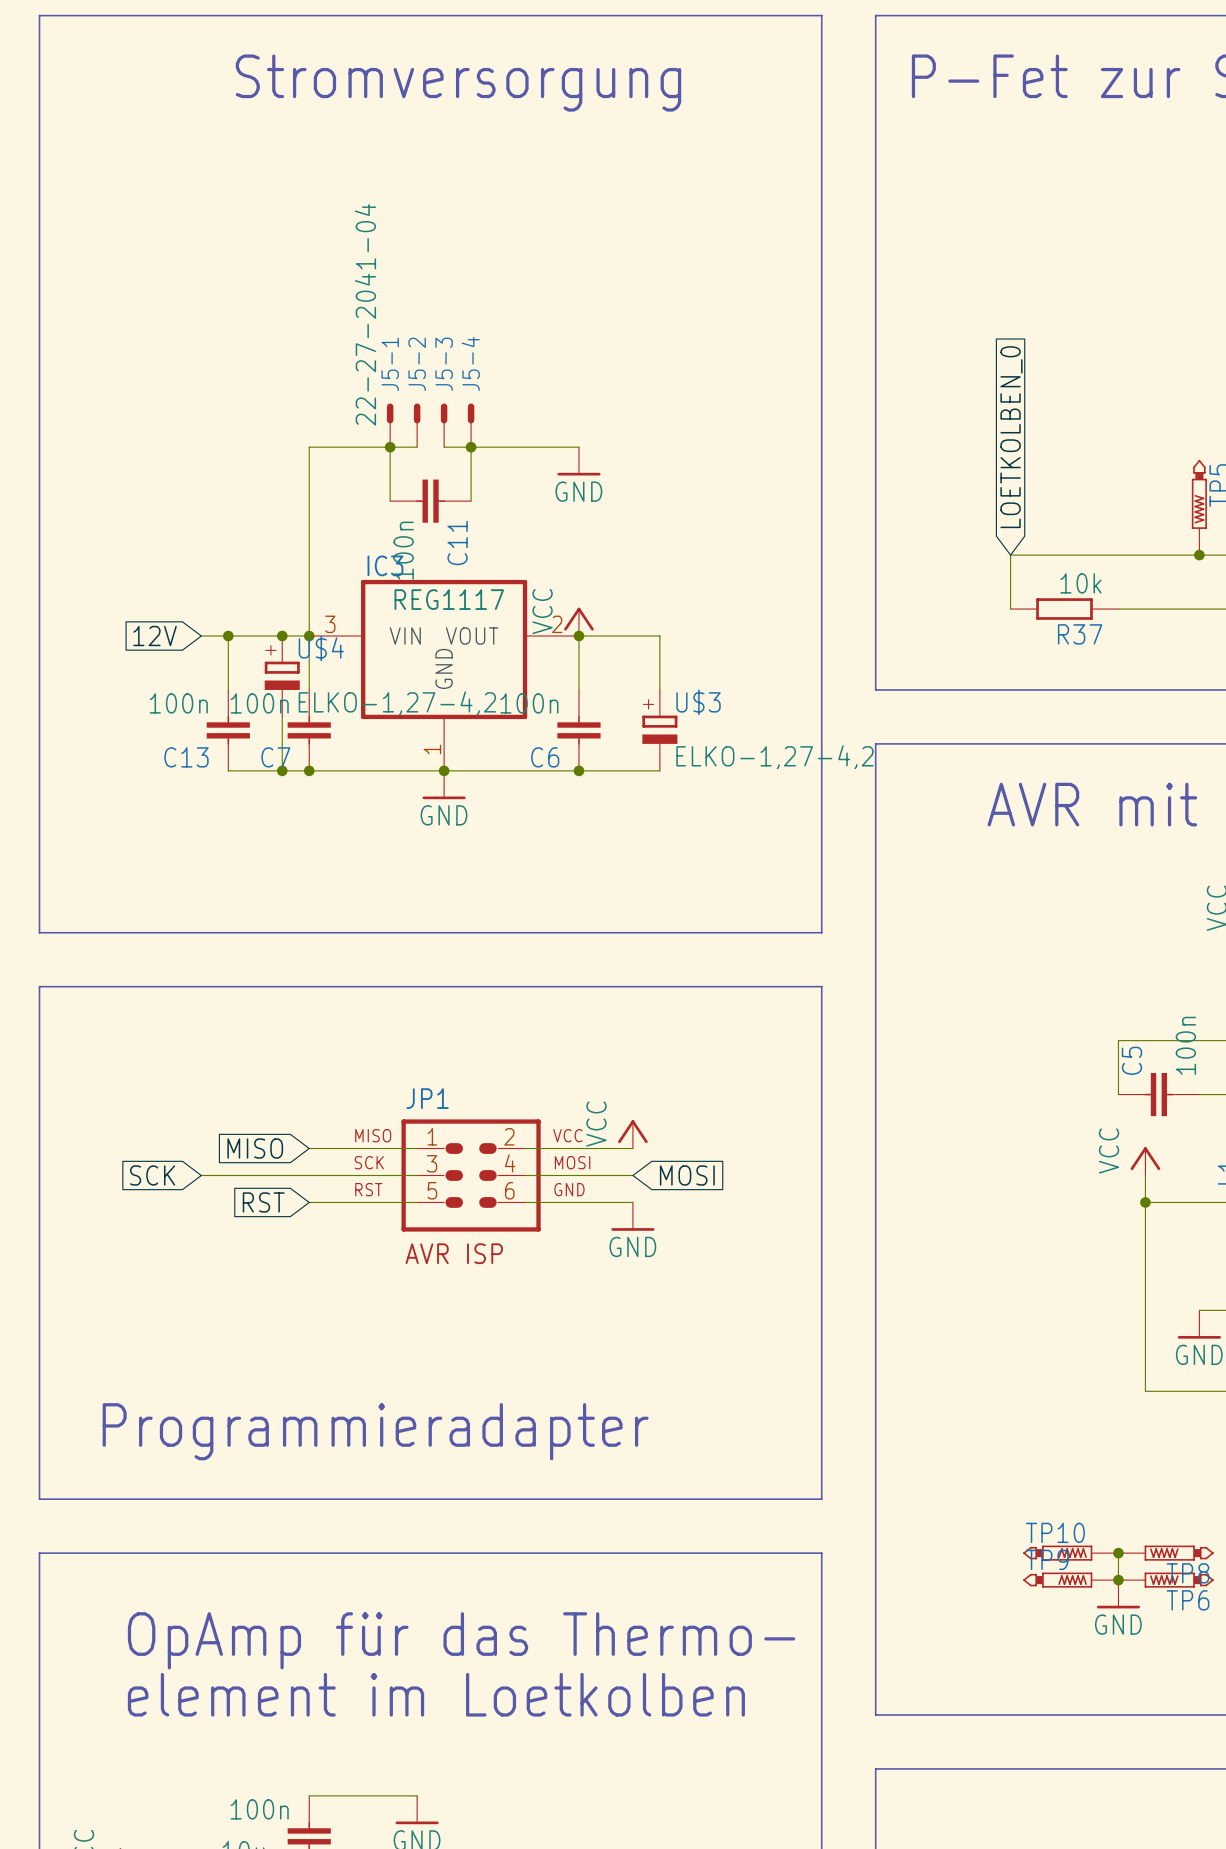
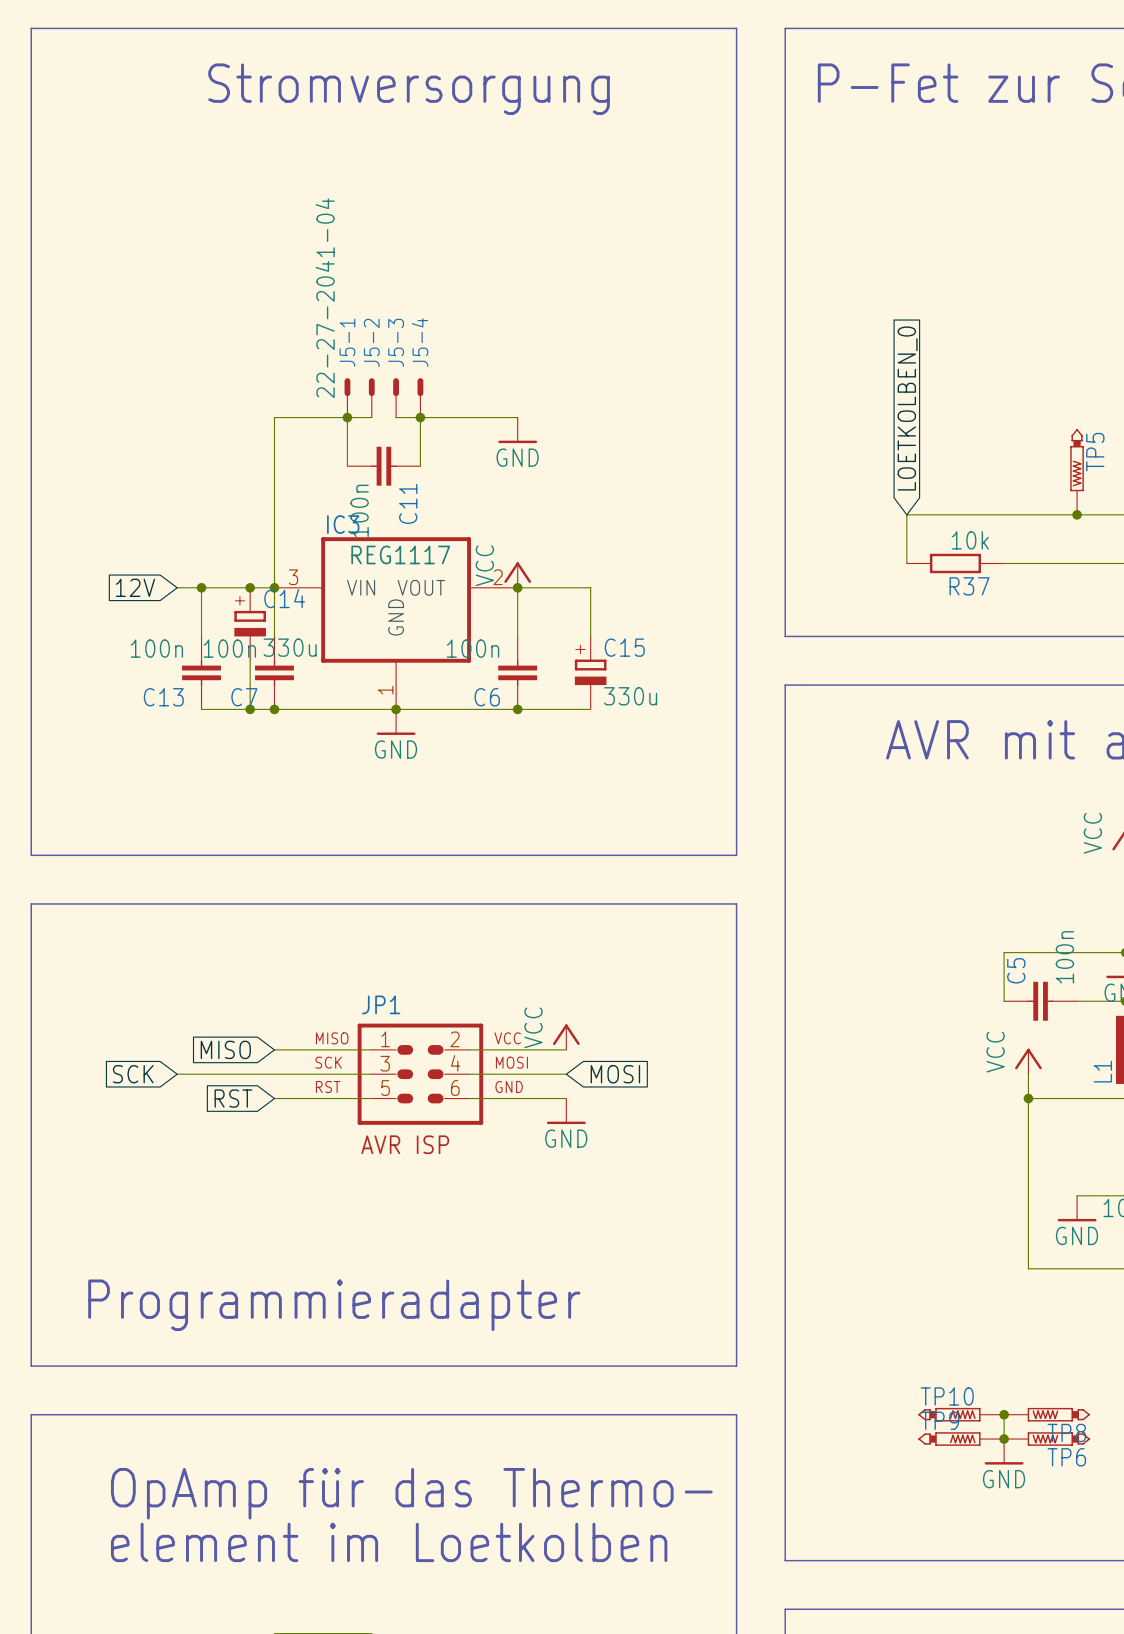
U$4 name: U$4 (321, 648) -> C14 (284, 598)
U$3 name: U$3 (698, 702) -> C15 (624, 647)
U$4 value: ELKO-1,27-4,2 (397, 703) -> 330u (290, 647)
U$3 value: ELKO-1,27-4,2 (774, 757) -> 330u (630, 696)

